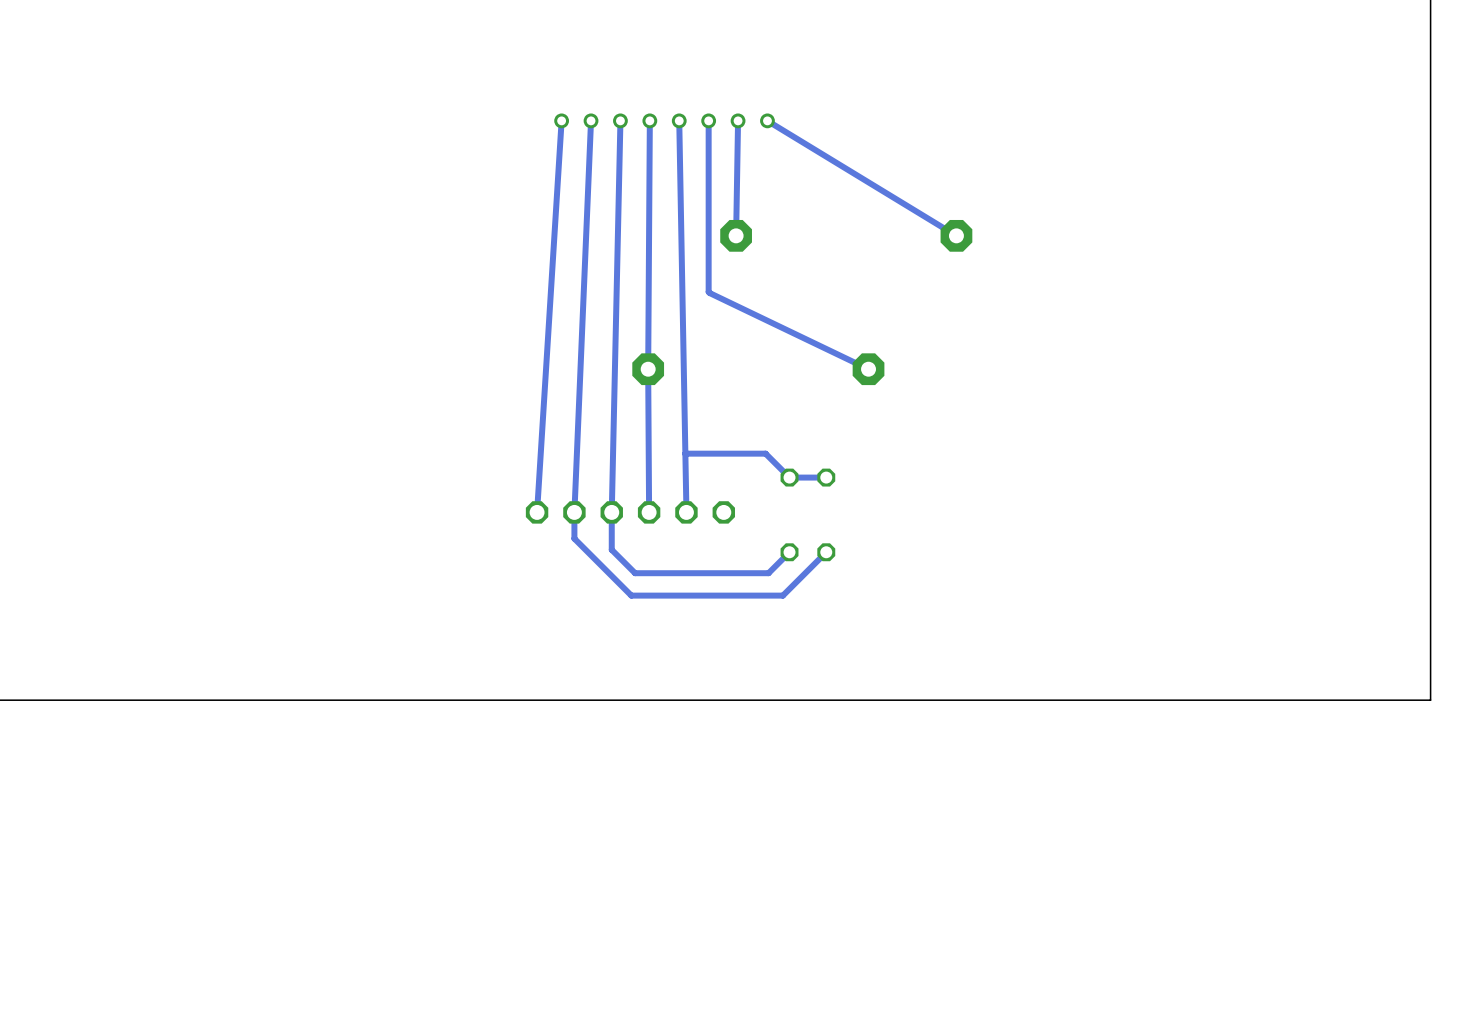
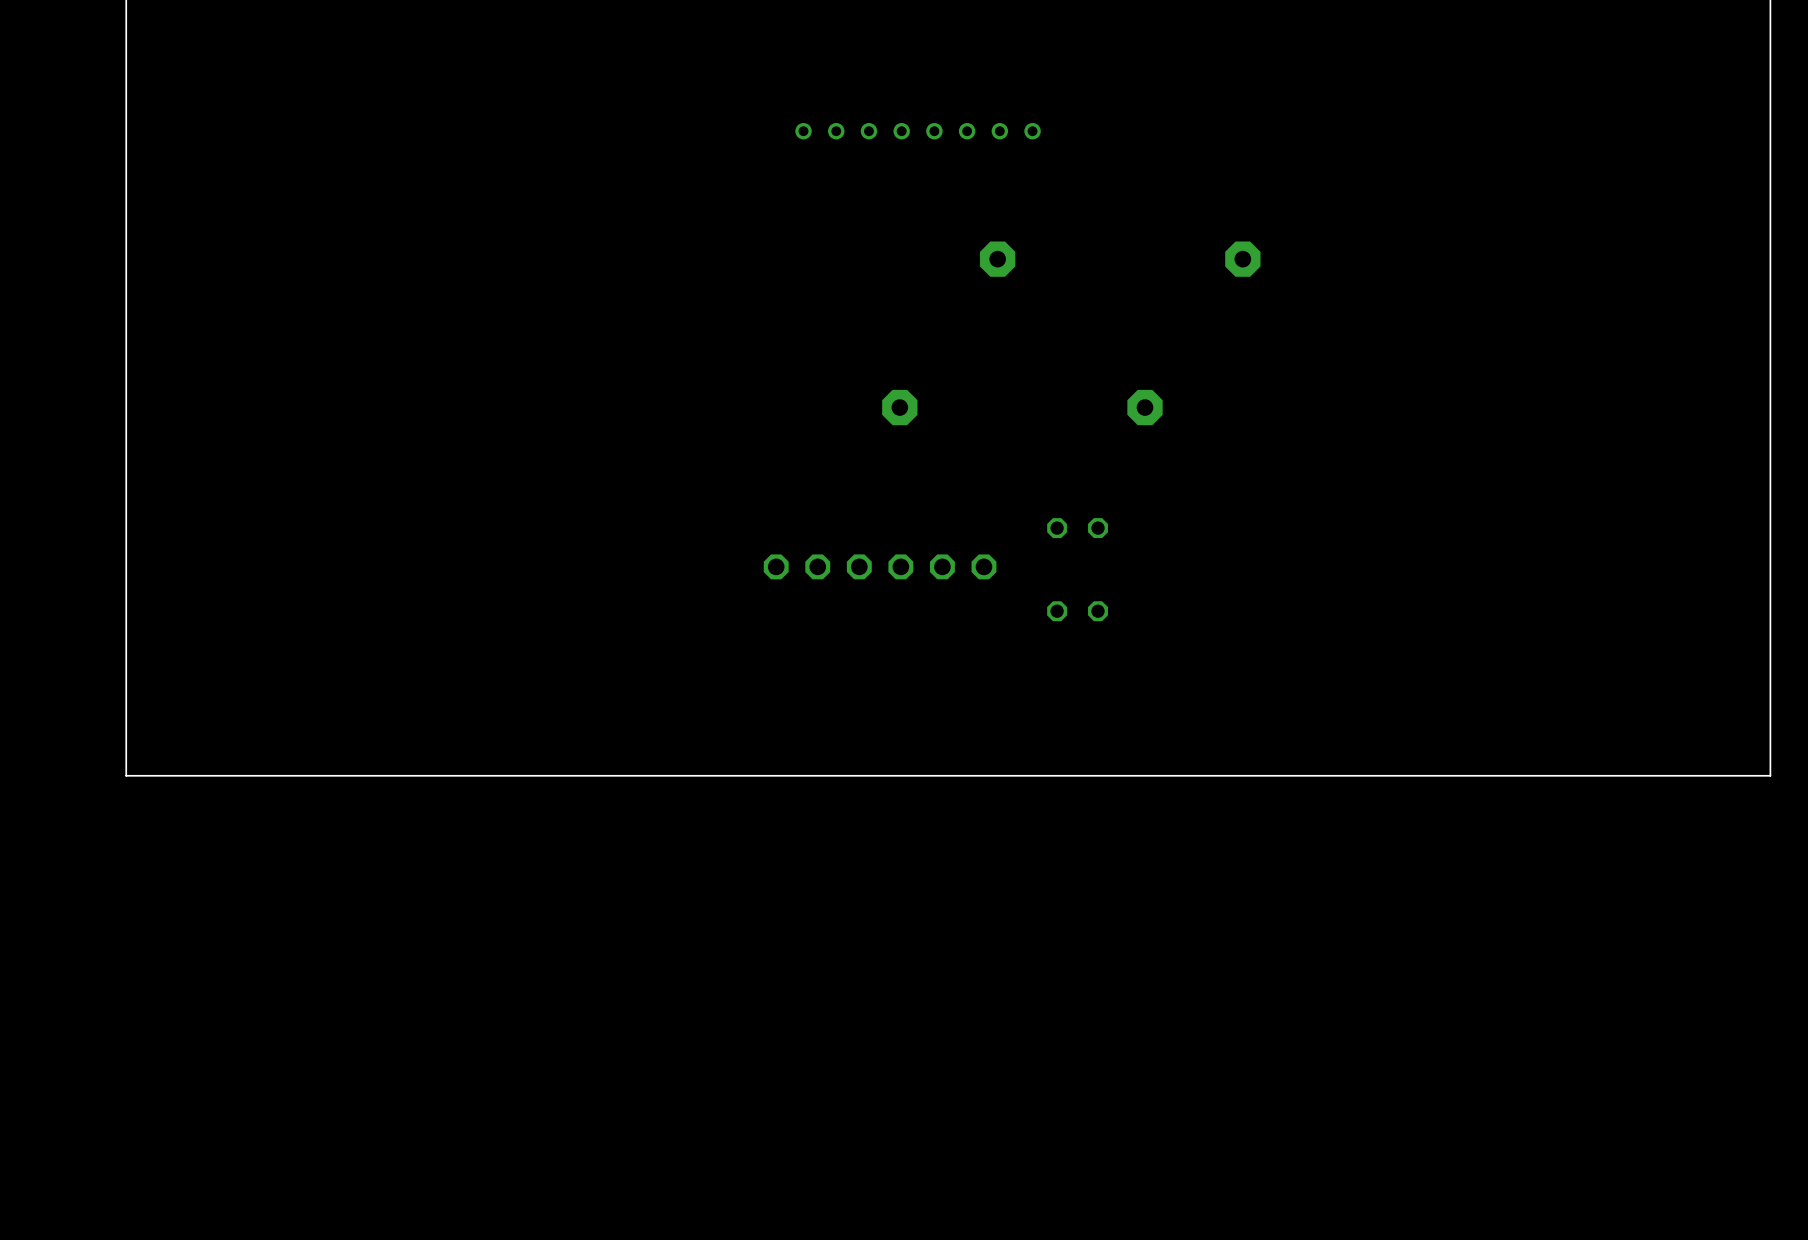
track: (561, 120) (537, 512) -> none
track: (591, 120) (574, 538) (631, 595) (782, 595) (826, 552) -> none
track: (620, 120) (611, 549) (635, 573) (768, 573) (789, 552) -> none
track: (649, 120) (649, 512) -> none
track: (679, 120) (686, 512) -> none
track: (708, 120) (708, 291) (868, 369) -> none
track: (738, 120) (736, 235) -> none
track: (767, 120) (956, 235) -> none
track: (685, 453) (765, 453) (789, 477) (826, 477) -> none

